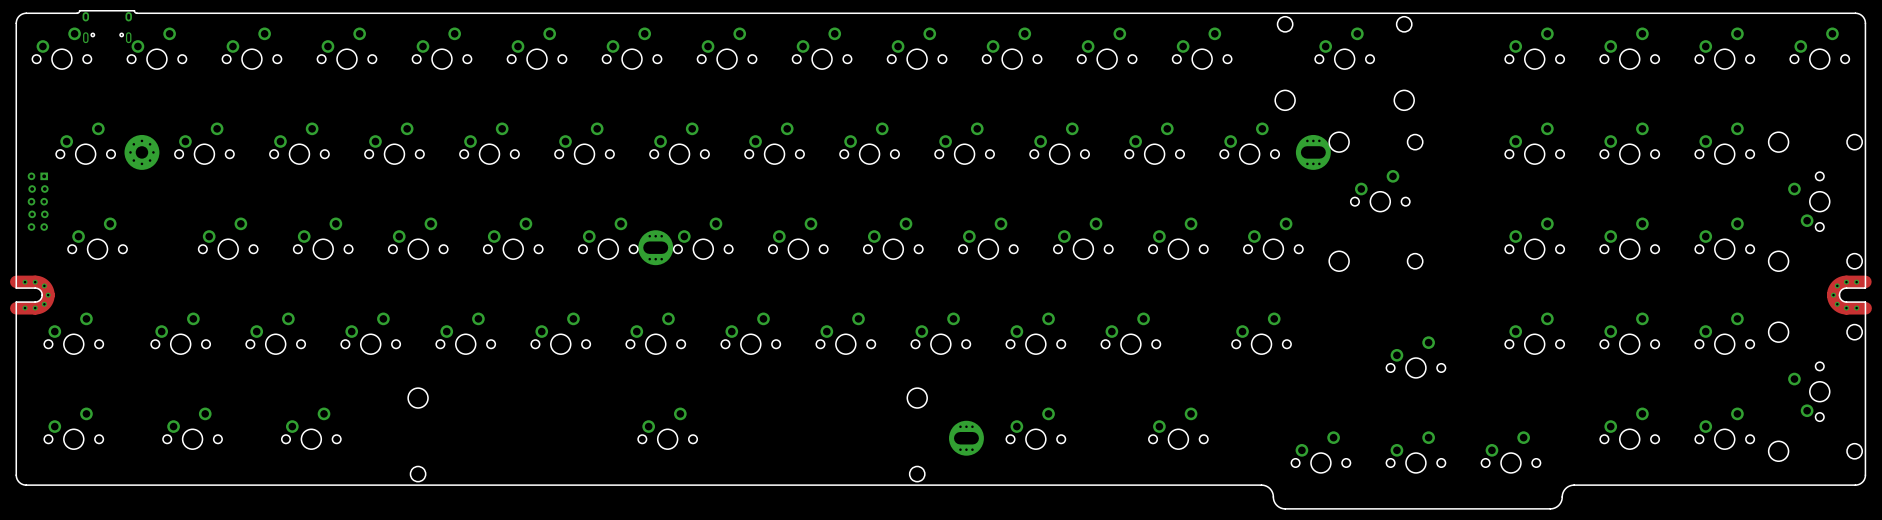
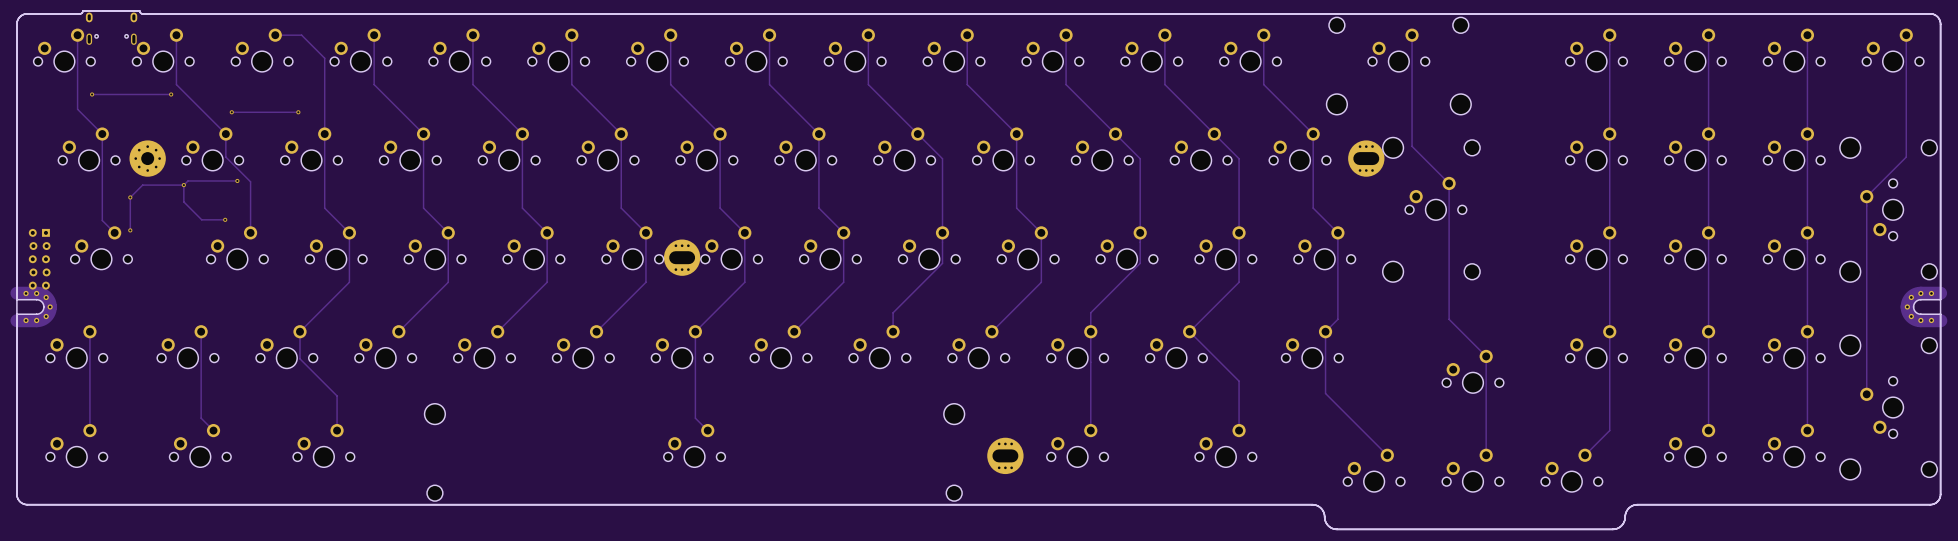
drawing: none -> [16, 10, 1942, 531]
track: none -> (77, 35) (77, 109) (102, 134) (102, 220) (114, 232)
track: none -> (176, 35) (176, 84) (225, 134) (225, 157) (250, 181) (250, 232)
track: none -> (275, 35) (301, 35) (324, 58) (324, 208) (349, 232) (349, 282) (299, 331) (299, 358) (337, 395) (337, 430)
track: none -> (374, 35) (374, 84) (423, 134) (423, 208) (448, 232) (448, 282) (398, 331)
track: none -> (472, 35) (472, 84) (522, 134) (522, 208) (547, 232) (547, 282) (497, 331)
track: none -> (571, 35) (571, 84) (621, 134) (621, 208) (645, 232) (645, 282) (596, 331)
track: none -> (670, 35) (670, 84) (720, 134) (720, 208) (744, 232) (744, 282) (695, 331) (695, 418) (707, 430)
track: none -> (769, 35) (769, 84) (818, 134) (818, 208) (843, 232) (843, 282) (794, 331)
track: none -> (868, 35) (868, 84) (942, 158) (942, 263) (893, 312) (893, 331)
track: none -> (967, 35) (967, 84) (1016, 134) (1016, 208) (1041, 232) (1041, 282) (991, 331)
track: none -> (1066, 35) (1066, 84) (1140, 158) (1140, 263) (1090, 312) (1090, 430)
track: none -> (1164, 35) (1164, 84) (1239, 158) (1239, 282) (1189, 331) (1239, 381) (1239, 430)
track: none -> (1263, 35) (1263, 84) (1313, 134) (1313, 208) (1337, 232) (1337, 319) (1325, 331) (1325, 393) (1387, 455)
track: none -> (1412, 35) (1412, 146) (1449, 183) (1449, 319) (1486, 356) (1486, 455)
track: none -> (1609, 35) (1609, 430) (1585, 455)
track: none -> (1708, 35) (1708, 430)
track: none -> (1807, 35) (1807, 430)
track: none -> (1906, 35) (1906, 157) (1866, 196) (1866, 394)
track: none -> (92, 94) (171, 94)
via: none -> (92, 94)
via: none -> (171, 94)
track: none -> (231, 112) (298, 112)
via: none -> (231, 112)
via: none -> (298, 112)
track: none -> (237, 180) (187, 180) (183, 185)
via: none -> (237, 180)
track: none -> (183, 185) (142, 185) (130, 197) (130, 230)
track: none -> (183, 185) (183, 201) (201, 219) (225, 219)
via: none -> (183, 185)
via: none -> (130, 197)
part position: (38, 201) -> (39, 259)
via: none -> (225, 219)
via: none -> (130, 230)
track: none -> (89, 331) (89, 430)
track: none -> (201, 331) (201, 418) (213, 430)

